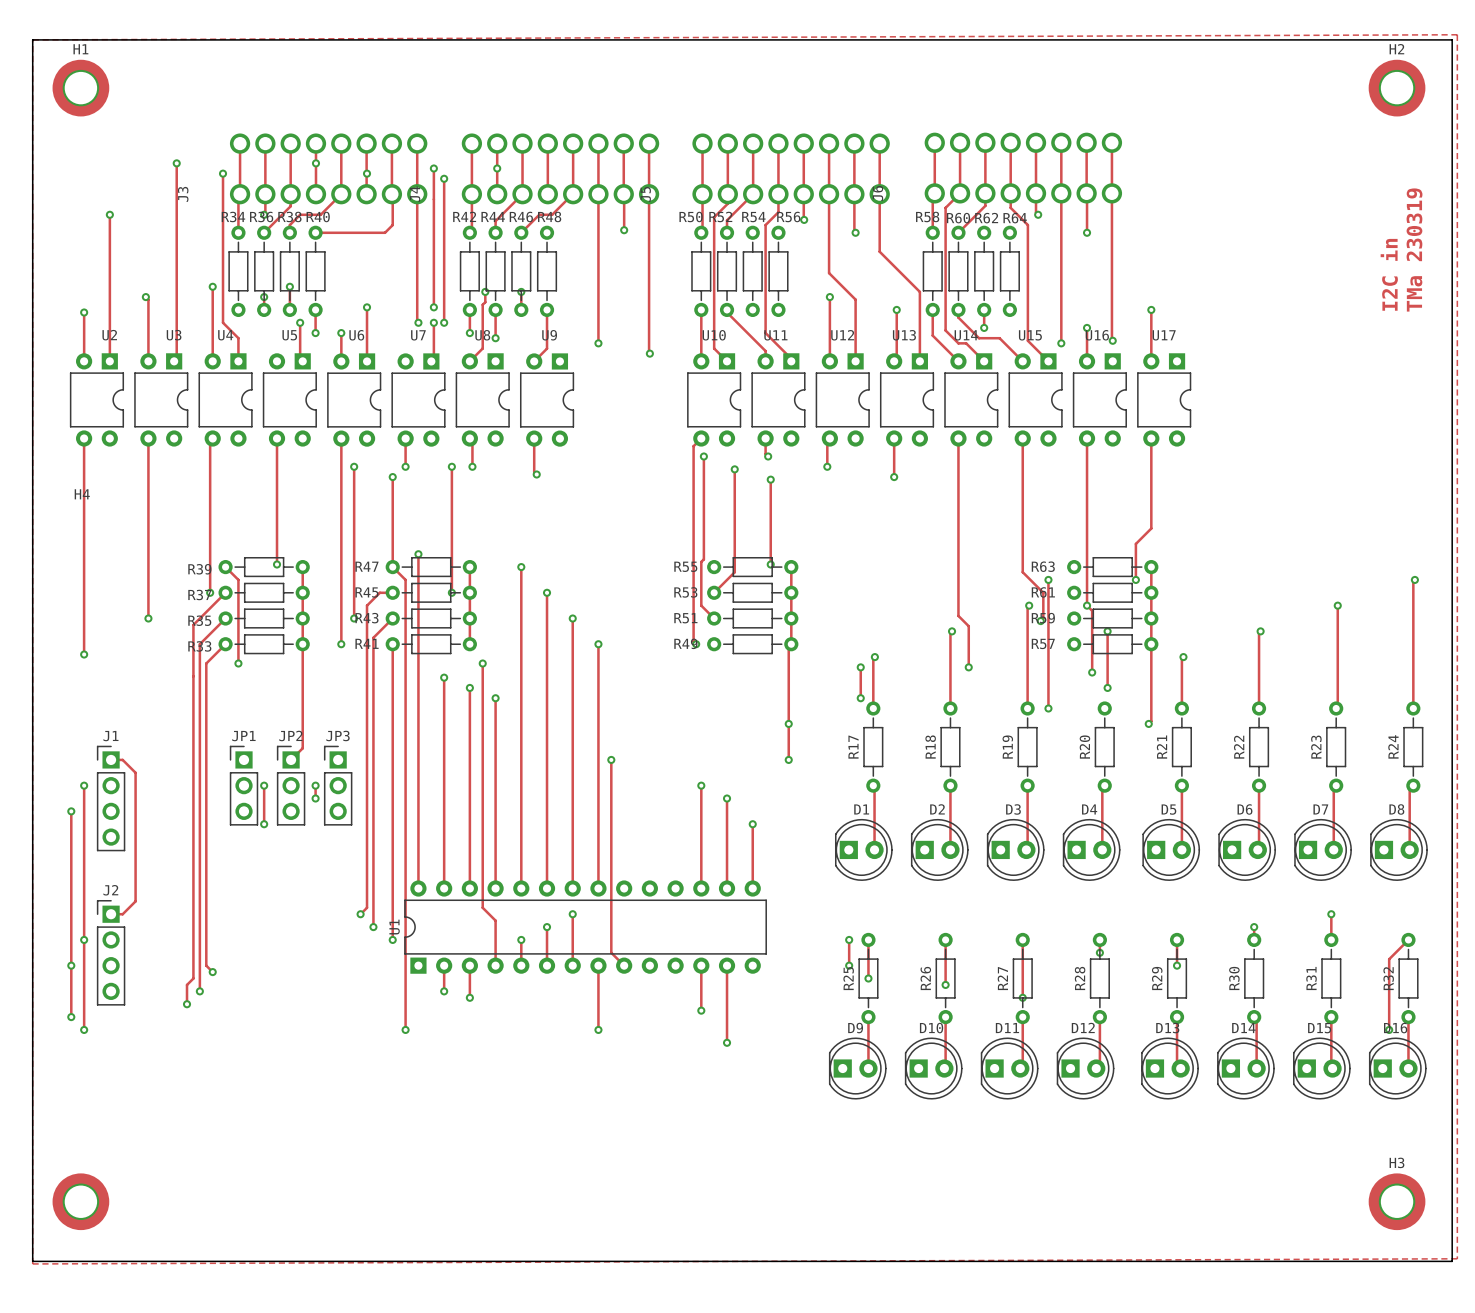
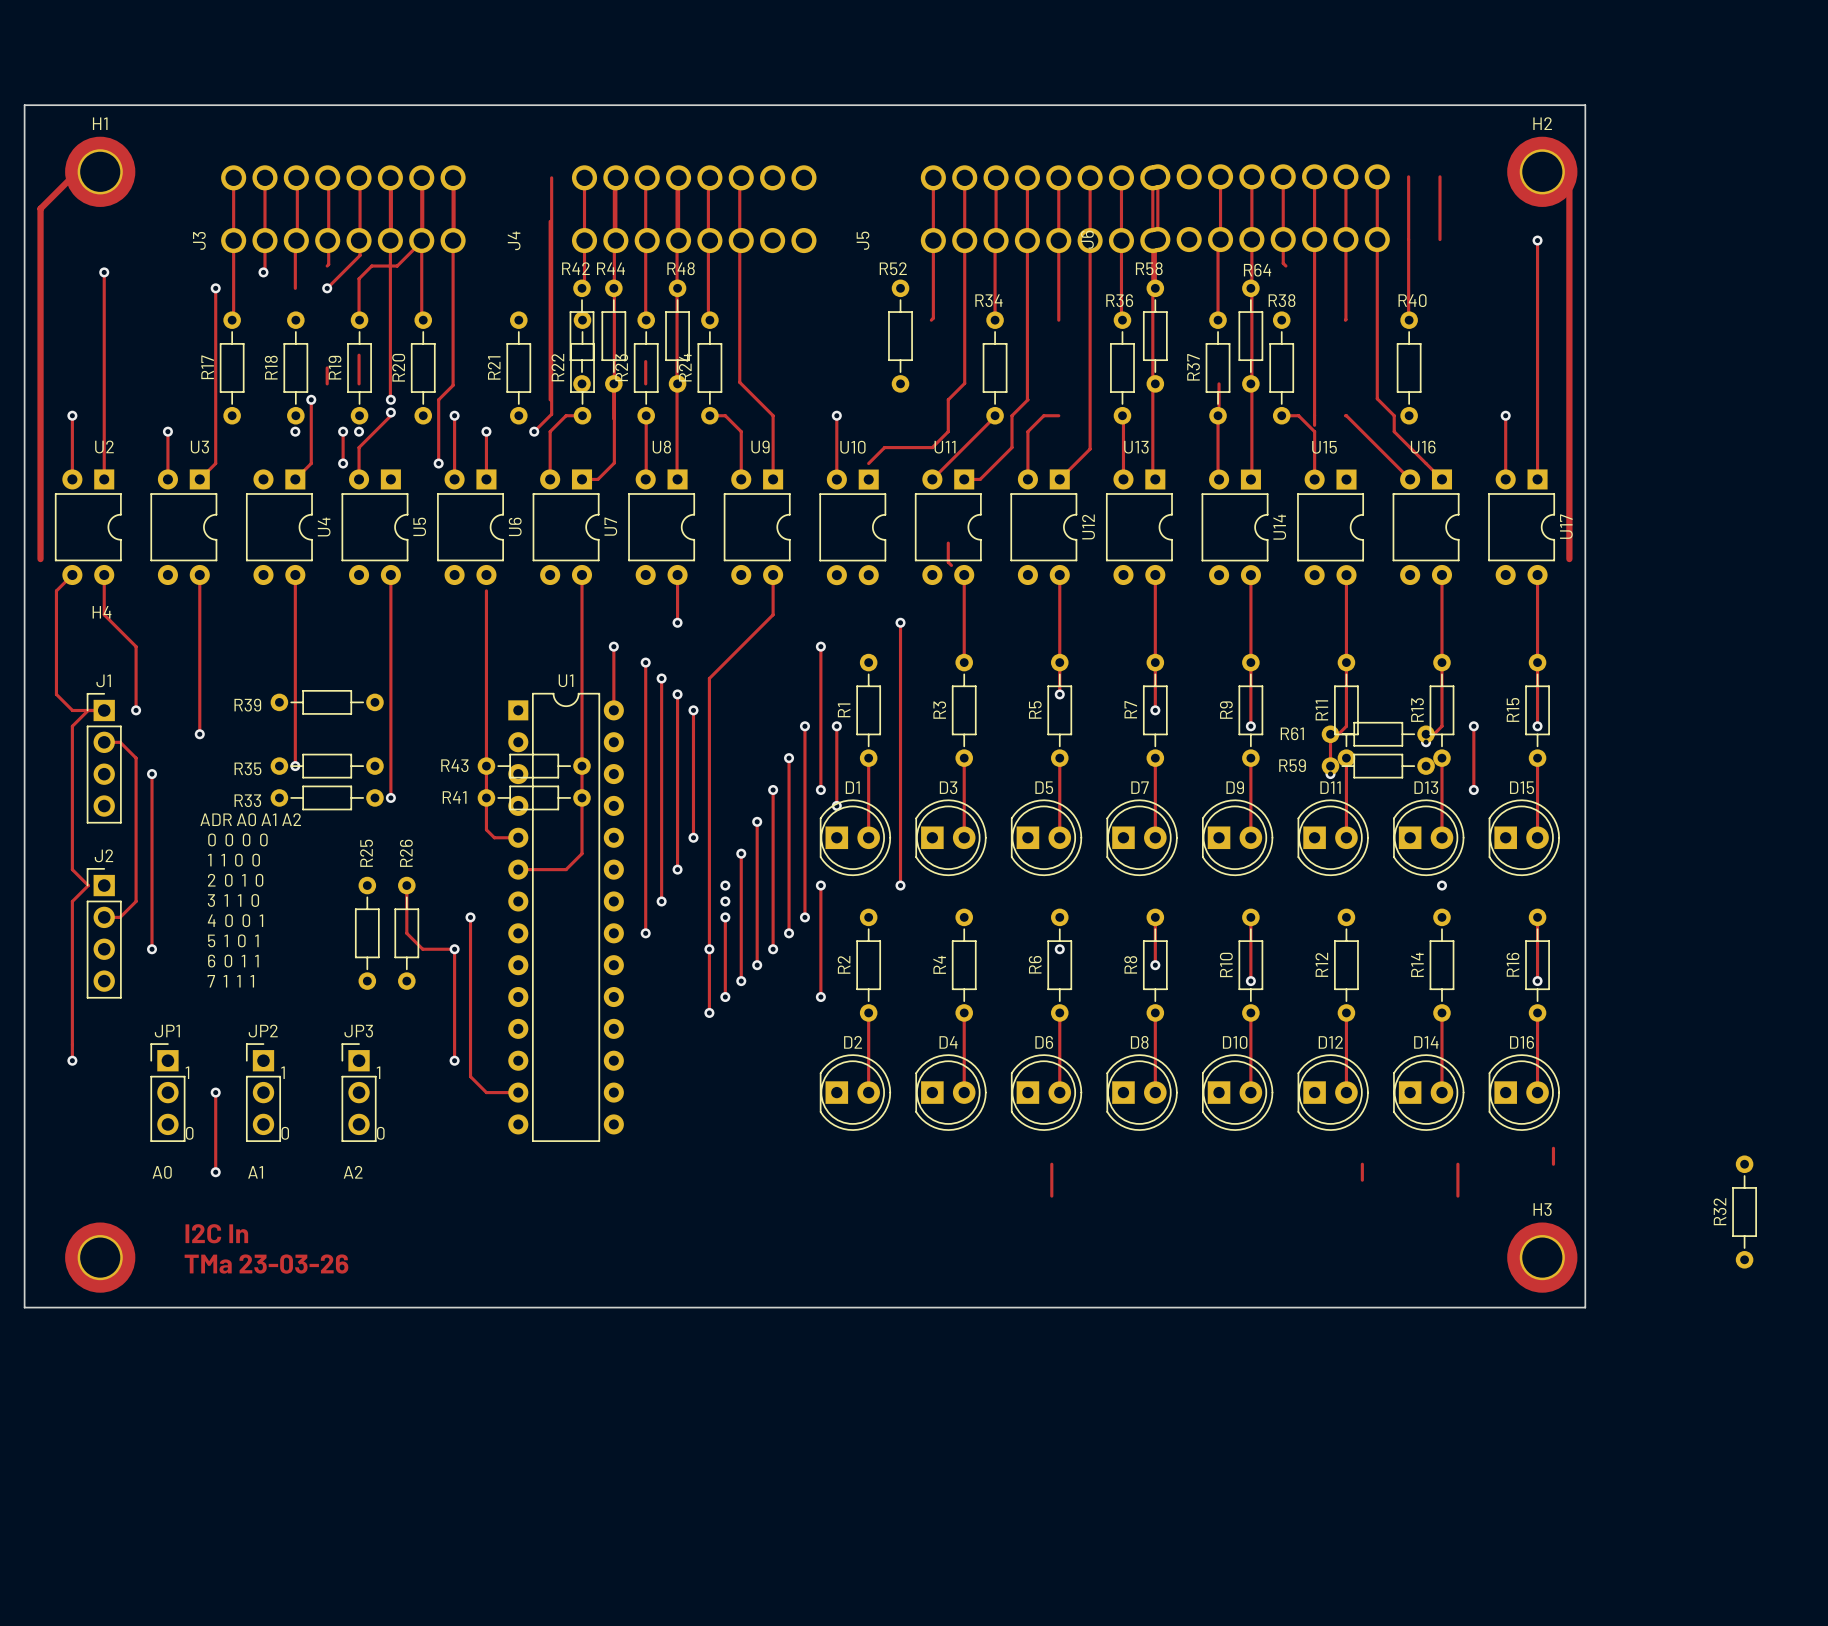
zone outline: (1457, 34) (32, 39) (32, 1263) (1457, 1258) (1457, 34) -> none
board edge: (32, 39) (1452, 39) (1452, 1261) (32, 1261) (32, 39) -> (24, 105) (24, 1307) (1585, 1307) (1585, 105) (24, 105)
H1 position: (80, 88) -> (100, 171)
H2 position: (1397, 88) -> (1542, 171)
track: none -> (100, 171) (77, 171) (40, 208) (40, 559)
track: none -> (1542, 171) (1564, 171) (1569, 176) (1569, 559)
track: (960, 142) (960, 193) (945, 207) (945, 330) (958, 343) (966, 343) (984, 361) -> none
track: none -> (1408, 176) (1409, 320)
track: none -> (1439, 176) (1439, 239)
track: none -> (233, 177) (232, 320)
track: none -> (264, 177) (263, 272)
track: none -> (390, 177) (390, 399)
track: none -> (421, 177) (423, 320)
track: none -> (453, 177) (453, 385) (438, 399) (438, 463)
track: (391, 143) (392, 225) (385, 232) (315, 232) -> none
track: (417, 143) (418, 322) -> none
track: none -> (551, 177) (551, 414) (534, 431)
track: none -> (614, 177) (614, 463) (597, 479) (582, 479)
track: none -> (645, 177) (646, 320)
track: (522, 143) (522, 194) (495, 221) (495, 232) -> none
track: none -> (677, 177) (677, 479)
track: none -> (708, 177) (709, 320)
track: (573, 143) (573, 194) (552, 214) (539, 214) (521, 232) -> none
track: none -> (739, 177) (739, 382) (773, 415) (773, 479)
track: (598, 143) (598, 343) -> none
track: (623, 143) (624, 230) -> none
track: (649, 143) (649, 353) -> none
track: (702, 143) (701, 232) -> none
track: (727, 143) (727, 203) (714, 217) (714, 348) (727, 361) -> none
track: (753, 143) (753, 194) (727, 220) (727, 232) -> (933, 177) (933, 318) (931, 320)
track: (778, 143) (778, 212) (765, 225) (765, 322) -> (964, 177) (964, 383) (948, 399)
track: (803, 143) (804, 219) -> (996, 177) (995, 320)
track: (829, 143) (829, 273) (855, 299) (855, 361) -> (1027, 177) (1027, 399) (1011, 415) (1011, 447) (980, 479) (964, 479)
track: (854, 143) (855, 232) -> (1058, 177) (1058, 320)
track: (879, 143) (879, 251) (919, 291) (919, 361) -> (1090, 177) (1090, 449) (1059, 479)
track: none -> (1121, 177) (1122, 320)
track: none -> (1152, 177) (1152, 476) (1155, 479)
track: (176, 163) (176, 358) (174, 361) -> none
via: (176, 163) -> none
via: (315, 163) -> none
J3 position: (328, 168) -> (343, 209)
track: (433, 168) (433, 307) -> none
via: (433, 168) -> none
via: (497, 168) -> none
J5 position: (791, 168) -> (1043, 209)
track: (223, 173) (223, 322) (238, 338) (238, 361) -> none
via: (223, 173) -> none
via: (367, 173) -> none
via: (444, 178) -> none
track: (985, 193) (985, 205) (958, 232) -> (1220, 239) (1218, 242) (1218, 320)
track: (1086, 193) (1087, 232) -> (1345, 239) (1345, 320)
J3 name position: J3 (183, 194) -> J3 (199, 240)
track: none -> (1537, 240) (1537, 479)
via: none -> (1537, 240)
track: (1010, 207) (1027, 225) (1027, 340) (1048, 361) -> (1251, 257) (1250, 479)
track: (109, 214) (109, 361) -> none
via position: (109, 214) -> (104, 272)
via position: (264, 214) -> (327, 288)
via: (1038, 214) -> none
track: none -> (104, 272) (104, 387)
via: none -> (263, 272)
via: (804, 219) -> none
via: (624, 230) -> none
track: none -> (215, 288) (215, 463) (199, 479)
via: none -> (215, 288)
track: none -> (359, 288) (359, 320)
via: (855, 232) -> none
via: (1087, 232) -> none
text: TMa 230319 (1414, 250) -> none
R34 position: (238, 271) -> (995, 367)
R36 position: (264, 271) -> (1122, 367)
R38 position: (289, 271) -> (1281, 367)
R40 position: (315, 271) -> (1409, 367)
R46: (521, 271) -> none
R50: (701, 271) -> none
R54: (752, 271) -> none
R56: (778, 271) -> none
R60: (958, 271) -> none
R62: (984, 271) -> none
text: I2C in (1389, 274) -> none
track: (212, 286) (212, 361) -> none
via: (212, 286) -> none
via: (289, 286) -> none
track: (485, 291) (485, 302) (482, 304) (482, 348) (469, 361) -> none
via: (485, 291) -> none
via: (521, 291) -> none
track: (145, 297) (148, 299) (148, 361) -> none
via: (145, 297) -> none
via: (264, 297) -> none
track: (829, 297) (829, 348) -> (1058, 415) (1043, 415) (1027, 431)
via: (829, 297) -> none
track: (367, 307) (367, 335) -> none
via: (367, 307) -> none
via: (433, 307) -> none
track: (315, 309) (315, 333) -> none
track: (469, 309) (469, 333) -> none
track: (547, 309) (547, 348) (534, 361) -> none
track: (701, 309) (701, 361) -> (836, 415) (836, 479)
track: (727, 309) (727, 312) (765, 351) (765, 361) -> none
track: (896, 309) (896, 358) (894, 361) -> none
via: (896, 309) -> none
track: (932, 309) (932, 335) (958, 361) -> none
track: (958, 309) (958, 317) (979, 338) (999, 338) (1022, 361) -> none
track: (1151, 309) (1151, 361) -> (1505, 415) (1505, 479)
via: (1151, 309) -> none
via: (84, 312) -> none
track: (1111, 321) (1112, 340) -> (1377, 398) (1394, 415) (1394, 431) (1441, 479)
track: none -> (311, 399) (311, 463) (295, 479)
via: none -> (311, 399)
track: (300, 322) (300, 358) (302, 361) -> none
via: (300, 322) -> none
via: none -> (390, 399)
via: (418, 322) -> none
track: (433, 322) (433, 358) (431, 361) -> none
via: (433, 322) -> none
via: (444, 322) -> none
via: (984, 327) -> none
track: (1087, 327) (1087, 361) -> none
via: (1087, 327) -> none
track: (341, 333) (341, 361) -> none
via: (341, 333) -> none
via: (469, 333) -> none
track: (765, 333) (791, 358) (791, 361) -> (948, 412) (948, 431) (932, 447) (884, 447) (868, 463)
track: none -> (72, 415) (72, 479)
via: none -> (72, 415)
U4 name rotation: 0° (225, 335) -> 90° counterclockwise (324, 526)
U4 name position: U4 (225, 335) -> U4 (324, 526)
U5 name rotation: 0° (289, 335) -> 90° counterclockwise (419, 526)
U5 name position: U5 (289, 335) -> U5 (419, 526)
track: none -> (390, 415) (359, 447) (359, 479)
U6 name rotation: 0° (356, 335) -> 90° counterclockwise (515, 526)
U6 name position: U6 (356, 335) -> U6 (515, 526)
via: none -> (454, 415)
U7 name rotation: 0° (418, 335) -> 90° counterclockwise (610, 526)
U7 name position: U7 (418, 335) -> U7 (610, 526)
track: none -> (582, 415) (566, 415) (550, 431) (550, 479)
track: none -> (646, 415) (645, 479)
track: none -> (709, 415) (725, 415) (741, 431) (741, 479)
track: none -> (995, 415) (932, 479)
U12 name rotation: 0° (842, 335) -> 90° counterclockwise (1088, 526)
U12 name position: U12 (842, 335) -> U12 (1088, 526)
track: none -> (1122, 415) (1123, 479)
U14 name rotation: 0° (966, 335) -> 90° counterclockwise (1279, 527)
U14 name position: U14 (966, 335) -> U14 (1279, 527)
track: none -> (1218, 415) (1219, 479)
track: none -> (1281, 415) (1298, 415) (1314, 431) (1314, 479)
track: none -> (1345, 415) (1410, 479)
U17 name rotation: 0° (1164, 335) -> 90° counterclockwise (1566, 526)
U17 name position: U17 (1164, 335) -> U17 (1566, 526)
via: none -> (1505, 415)
via: (495, 338) -> none
via: (1112, 340) -> none
via: (598, 343) -> none
via: (1061, 343) -> none
track: none -> (167, 431) (167, 479)
via: none -> (167, 431)
via: none -> (295, 431)
track: none -> (343, 431) (343, 463)
via: none -> (343, 431)
via: none -> (359, 431)
track: none -> (486, 431) (486, 479)
via: none -> (486, 431)
via: none -> (534, 431)
via position: (649, 353) -> (836, 415)
track: none -> (104, 447) (104, 479)
track: none -> (454, 447) (454, 479)
track: none -> (1027, 447) (1027, 479)
via: none -> (343, 463)
via: none -> (438, 463)
U2 position: (96, 399) -> (88, 527)
U3 position: (161, 399) -> (183, 527)
U4 position: (225, 399) -> (279, 527)
U5 position: (289, 399) -> (374, 527)
U8 position: (482, 399) -> (661, 527)
U10 position: (714, 399) -> (852, 527)
U11 position: (778, 399) -> (948, 527)
U12 position: (842, 399) -> (1043, 527)
U13 position: (907, 399) -> (1139, 527)
U14 position: (971, 399) -> (1235, 527)
U15 position: (1035, 399) -> (1330, 527)
U16 position: (1099, 399) -> (1426, 527)
U17 position: (1164, 399) -> (1521, 527)
U6 position: (354, 400) -> (470, 527)
U7 position: (418, 400) -> (566, 527)
U9 position: (547, 400) -> (757, 527)
track: (84, 438) (84, 654) -> none
track: (148, 438) (148, 618) -> (390, 574) (390, 797)
track: (212, 438) (210, 441) (210, 592) -> none
track: (277, 438) (277, 564) -> none
track: (341, 438) (341, 644) -> none
track: (405, 438) (405, 466) -> none
track: (469, 438) (472, 441) (472, 466) -> none
track: (534, 438) (534, 471) (536, 474) -> none
track: (701, 438) (693, 446) (693, 641) (696, 644) -> none
track: (829, 438) (827, 441) (827, 466) -> none
track: (894, 438) (894, 477) -> none
track: (958, 438) (958, 615) (968, 626) (968, 667) -> none
track: (1022, 438) (1022, 572) (1043, 592) (1043, 618) (1040, 621) -> none
track: (1087, 438) (1087, 464) -> none
track: (1151, 438) (1151, 528) (1135, 543) (1135, 579) -> none
track: (703, 456) (703, 559) (701, 561) (701, 605) (714, 618) -> none
via: (703, 456) -> none
via: (768, 456) -> none
track: none -> (72, 574) (56, 590) (56, 694) (72, 710) (104, 710)
track: none -> (104, 574) (104, 614) (136, 646) (136, 710)
track: none -> (199, 574) (199, 734)
track: none -> (582, 574) (582, 702)
track: none -> (677, 574) (677, 622)
track: none -> (773, 574) (773, 614) (709, 678) (709, 766)
track: none -> (964, 574) (964, 662)
track: none -> (1059, 574) (1059, 694)
track: none -> (1155, 574) (1155, 710)
track: none -> (1250, 575) (1250, 662)
track: none -> (1441, 574) (1441, 726) (1426, 742)
track: none -> (1537, 574) (1537, 726)
track: (354, 466) (354, 618) -> none
via: (354, 466) -> none
via: (405, 466) -> none
track: (451, 466) (451, 592) -> none
via: (451, 466) -> none
via: (472, 466) -> none
via: (827, 466) -> none
track: (734, 469) (734, 572) (714, 592) -> none
via: (734, 469) -> none
via position: (536, 474) -> (677, 622)
via: (392, 477) -> none
via: (894, 477) -> none
track: (770, 479) (770, 564) -> none
via: (770, 479) -> none
track: none -> (900, 622) (900, 885)
via: none -> (900, 622)
track: none -> (613, 646) (613, 710)
via: none -> (613, 646)
track: none -> (820, 646) (820, 789)
via: none -> (820, 646)
track: none -> (645, 662) (645, 702)
via: none -> (645, 662)
track: none -> (1250, 662) (1250, 726)
track: none -> (661, 678) (661, 901)
via: none -> (661, 678)
track: (418, 554) (418, 888) -> none
via: (418, 554) -> none
track: none -> (677, 694) (677, 734)
via: none -> (677, 694)
via: none -> (1059, 694)
via: (277, 564) -> none
via: (770, 564) -> none
track: (225, 567) (238, 579) -> (295, 574) (295, 718)
track: (302, 567) (302, 748) (291, 759) -> none
track: (392, 567) (405, 579) (405, 1029) -> (486, 702) (486, 797)
R47: (431, 567) -> none
via: (521, 567) -> none
R55: (752, 567) -> none
track: (791, 567) (791, 644) (788, 646) (788, 759) -> none
R63: (1112, 567) -> none
track: (1151, 567) (1151, 721) (1148, 723) -> none
track: none -> (88, 710) (72, 726) (72, 869) (88, 885) (72, 901) (72, 1060)
via: none -> (136, 710)
track: none -> (693, 710) (693, 837)
via: none -> (693, 710)
R1: none -> (868, 710)
R3: none -> (964, 710)
R5: none -> (1059, 710)
R7: none -> (1155, 710)
via: none -> (1155, 710)
R9: none -> (1250, 710)
R11: none -> (1346, 710)
R13: none -> (1441, 710)
R15: none -> (1537, 710)
track: (1048, 579) (1048, 708) -> none
via: (1048, 579) -> none
via position: (1135, 579) -> (1426, 742)
track: (1414, 579) (1413, 581) (1413, 708) -> none
via: (1414, 579) -> none
track: none -> (804, 726) (804, 917)
via: none -> (804, 726)
track: none -> (836, 726) (836, 805)
via: none -> (836, 726)
via: none -> (1250, 726)
track: (1087, 586) (1087, 605) (1092, 610) (1092, 672) -> (1346, 726) (1330, 742) (1330, 774)
track: none -> (1473, 726) (1473, 789)
via: none -> (1473, 726)
via: none -> (1537, 726)
via: none -> (199, 734)
via: (210, 592) -> none
track: (225, 592) (193, 624) (193, 978) (187, 984) (187, 1004) -> none
R37 rotation: 0° (264, 592) -> 90° clockwise (1218, 367)
R37 position: (264, 592) -> (1218, 367)
track: (392, 592) (379, 592) (367, 605) (367, 766) -> (406, 885) (406, 933) (422, 949) (454, 949)
R45: (431, 592) -> none
via: (451, 592) -> none
via: (547, 592) -> none
R53: (752, 592) -> none
R37 name position: R37 (199, 594) -> R37 (1193, 367)
track: none -> (104, 742) (120, 742) (136, 758) (136, 901) (120, 917) (104, 917)
track: (1029, 605) (1027, 607) (1027, 708) -> none
via: (1029, 605) -> none
via: (1087, 605) -> none
track: (1337, 605) (1337, 706) (1336, 708) -> none
via: (1337, 605) -> none
track: none -> (789, 758) (789, 933)
via: none -> (789, 758)
track: none -> (868, 758) (868, 837)
track: none -> (964, 758) (964, 837)
track: none -> (1059, 758) (1059, 837)
track: none -> (1155, 758) (1155, 837)
track: none -> (1250, 758) (1250, 837)
track: none -> (1346, 758) (1346, 837)
track: none -> (1441, 758) (1441, 837)
track: none -> (1537, 758) (1537, 837)
via: (148, 618) -> none
track: (225, 618) (199, 644) (199, 991) -> none
track: (238, 618) (238, 663) -> none
via: none -> (295, 766)
via: (354, 618) -> none
track: (392, 618) (373, 637) (373, 927) -> none
via: (572, 618) -> none
R51: (752, 618) -> none
via: (1040, 621) -> none
track: none -> (152, 774) (152, 949)
via: none -> (152, 774)
via: none -> (1330, 774)
track: (952, 631) (950, 632) (950, 708) -> none
via: (952, 631) -> none
track: (1107, 631) (1107, 687) -> none
via: (1107, 631) -> none
track: (1260, 631) (1259, 632) (1259, 708) -> none
via: (1260, 631) -> none
track: none -> (773, 789) (773, 949)
via: none -> (773, 789)
via: none -> (820, 789)
track: (225, 644) (206, 663) (206, 965) (212, 972) -> none
via: none -> (390, 797)
via: (341, 644) -> none
track: none -> (582, 797) (582, 852)
track: (598, 644) (598, 689) -> none
via: (598, 644) -> none
via: (696, 644) -> none
R49: (752, 644) -> none
R57: (1112, 644) -> none
via: none -> (836, 805)
via: (84, 654) -> none
track: (874, 657) (873, 658) (873, 708) -> none
via: (874, 657) -> none
track: (1183, 657) (1181, 658) (1181, 708) -> none
via position: (1183, 657) -> (1473, 789)
text: none -> ADR A0 A1 A2 (250, 819)
via: (238, 663) -> none
track: (482, 663) (482, 907) (495, 920) (495, 965) -> none
via: (482, 663) -> none
via: none -> (757, 821)
track: (860, 667) (860, 698) -> none
via: (860, 667) -> none
via: (968, 667) -> none
track: (392, 669) (392, 939) -> (486, 829) (494, 837) (518, 837)
via: (1092, 672) -> none
via: none -> (693, 837)
track: (444, 677) (444, 888) -> none
via: (444, 677) -> none
text: none -> 0 0 0 0 (237, 839)
via: (469, 687) -> none
via: (1107, 687) -> none
track: (469, 689) (469, 888) -> (582, 853) (566, 869) (518, 869)
via: none -> (741, 853)
text: none -> 1 1 0 0 (233, 860)
track: (495, 698) (495, 888) -> none
via: (495, 698) -> none
via: (860, 698) -> none
track: (547, 702) (547, 888) -> none
via: none -> (677, 869)
via: (1048, 708) -> none
text: none -> 2 0 1 0 (235, 880)
via: none -> (725, 885)
via: none -> (820, 885)
via: none -> (900, 885)
via: (788, 723) -> none
via position: (1148, 723) -> (1441, 885)
text: none -> 3 1 1 0 (233, 900)
via: none -> (661, 901)
via: none -> (725, 901)
track: none -> (470, 917) (470, 1076) (486, 1092) (518, 1092)
via: none -> (470, 917)
via: none -> (725, 917)
via: none -> (804, 917)
track: none -> (1250, 917) (1250, 981)
track: none -> (1537, 917) (1537, 981)
text: none -> 4 0 0 1 (235, 920)
R17 position: (873, 747) -> (232, 367)
R18 position: (950, 747) -> (295, 367)
R19 position: (1027, 747) -> (359, 367)
R20 position: (1104, 747) -> (423, 367)
R21 position: (1181, 747) -> (518, 367)
R22 position: (1259, 747) -> (582, 367)
R23 position: (1336, 747) -> (646, 367)
R24 position: (1413, 747) -> (709, 367)
track: (521, 753) (521, 888) -> none
via: none -> (645, 933)
via: none -> (789, 933)
track: (111, 759) (122, 759) (135, 772) (135, 901) (122, 914) (111, 914) -> none
text: none -> 5 1 0 1 (233, 940)
via: (611, 759) -> none
via: (788, 759) -> none
via: none -> (152, 949)
via: none -> (454, 949)
via: none -> (709, 949)
via: none -> (773, 949)
via: none -> (1059, 949)
text: none -> 6 0 1 1 (233, 961)
track: (611, 779) (611, 952) (624, 965) -> none
via: none -> (757, 965)
R2: none -> (868, 965)
R4: none -> (964, 965)
R6: none -> (1059, 965)
R8: none -> (1155, 965)
via: none -> (1155, 965)
R10: none -> (1250, 965)
R12: none -> (1346, 965)
R14: none -> (1441, 965)
R16: none -> (1537, 965)
track: (84, 785) (84, 1029) -> none
via: (84, 785) -> none
JP1 position: (244, 785) -> (167, 1092)
track: (264, 785) (264, 824) -> none
via: (264, 785) -> none
JP2 position: (291, 785) -> (263, 1092)
track: (315, 785) (315, 798) -> none
via: (315, 785) -> none
JP3 position: (338, 785) -> (359, 1092)
track: (701, 785) (701, 817) -> none
via: (701, 785) -> none
track: (873, 785) (874, 849) -> none
track: (950, 785) (950, 849) -> (1155, 1012) (1155, 1092)
track: (1027, 785) (1026, 849) -> none
track: (1104, 785) (1102, 788) (1102, 849) -> none
track: (1181, 785) (1181, 849) -> (1441, 1012) (1441, 1092)
track: (1259, 785) (1257, 849) -> none
track: (1336, 785) (1333, 788) (1333, 849) -> none
track: (1413, 785) (1409, 789) (1409, 849) -> none
text: none -> 7 1 1 1 (230, 981)
track: (598, 792) (598, 888) -> (757, 821) (757, 941)
via: none -> (741, 981)
via: none -> (1250, 981)
via: none -> (1537, 981)
J1 position: (111, 798) -> (104, 758)
via: (315, 798) -> none
track: (727, 798) (727, 888) -> (820, 885) (820, 997)
via: (727, 798) -> none
via: none -> (725, 997)
via: none -> (820, 997)
track: (71, 811) (71, 1017) -> none
via: (71, 811) -> none
track: (572, 817) (572, 888) -> none
via: none -> (709, 1012)
track: none -> (1059, 1012) (1059, 1092)
track: none -> (1250, 1012) (1250, 1092)
track: none -> (1346, 1012) (1346, 1092)
track: none -> (1537, 1012) (1537, 1092)
D1 footprint: [835, 819, 893, 881] -> [819, 799, 891, 877]
D2 footprint: [911, 819, 969, 881] -> [819, 1054, 891, 1131]
D3 footprint: [987, 819, 1045, 881] -> [915, 799, 987, 877]
D4 footprint: [1062, 819, 1121, 881] -> [915, 1054, 987, 1131]
D5 footprint: [1142, 819, 1200, 881] -> [1010, 799, 1083, 877]
D6 footprint: [1218, 819, 1276, 881] -> [1010, 1054, 1083, 1131]
D7 footprint: [1294, 819, 1352, 881] -> [1106, 799, 1178, 877]
D8 footprint: [1370, 819, 1428, 881] -> [1106, 1054, 1178, 1131]
via: (264, 824) -> none
track: (752, 824) (752, 888) -> (964, 1012) (964, 1092)
via: (752, 824) -> none
via: none -> (72, 1060)
track: (367, 856) (367, 907) (360, 914) -> none
via: none -> (454, 1060)
text: none -> 1 (187, 1072)
text: none -> 1 (282, 1072)
text: none -> 1 (378, 1072)
track: none -> (215, 1092) (215, 1172)
via: none -> (215, 1092)
text: none -> 0 (189, 1133)
text: none -> 0 (285, 1133)
text: none -> 0 (380, 1133)
via: (360, 914) -> none
track: (572, 914) (572, 965) -> none
via: (572, 914) -> none
track: (1331, 914) (1331, 939) -> none
via: (1331, 914) -> none
via: (373, 927) -> none
track: (547, 927) (547, 965) -> none
via: (547, 927) -> none
U1 rotation: 0° (585, 927) -> 90° clockwise (566, 917)
U1 position: (585, 927) -> (566, 917)
via: (1254, 927) -> none
via: (84, 939) -> none
via: (392, 939) -> none
track: (521, 939) (521, 965) -> none
via: (521, 939) -> none
via: (849, 939) -> none
track: (868, 939) (868, 978) -> (1155, 917) (1155, 965)
track: (945, 939) (945, 984) -> none
track: (1022, 939) (1022, 997) -> none
track: (1408, 939) (1389, 959) (1389, 1029) -> none
text: none -> A0 (162, 1172)
via: none -> (215, 1172)
text: none -> A1 (255, 1172)
text: none -> A2 (353, 1172)
J2 position: (111, 952) -> (104, 933)
via: (1099, 952) -> none
via: (71, 965) -> none
track: (444, 965) (444, 991) -> none
track: (469, 965) (469, 997) -> none
track: (598, 965) (598, 1029) -> (725, 917) (725, 997)
track: (701, 965) (701, 1010) -> none
track: (727, 965) (727, 1042) -> none
via: (849, 965) -> none
via: (1177, 965) -> none
via: (212, 972) -> none
R25 name position: R25 (848, 978) -> R25 (366, 853)
R25 position: (868, 978) -> (367, 933)
via: (868, 978) -> none
R26 name position: R26 (925, 978) -> R26 (406, 853)
R26 position: (945, 978) -> (406, 933)
R27: (1022, 978) -> none
R28: (1099, 978) -> none
R29: (1177, 978) -> none
R30: (1254, 978) -> none
R31: (1331, 978) -> none
via: (945, 984) -> none
via: (199, 991) -> none
via: (444, 991) -> none
text: none -> I2C In (216, 1233)
via: (469, 997) -> none
via: (1022, 997) -> none
via: (187, 1004) -> none
via: (701, 1010) -> none
via: (71, 1017) -> none
track: (868, 1017) (868, 1068) -> none
track: (945, 1017) (944, 1068) -> none
track: (1022, 1017) (1022, 1066) (1020, 1068) -> none
track: (1099, 1017) (1099, 1064) (1096, 1068) -> none
track: (1177, 1017) (1177, 1064) (1180, 1068) -> none
track: (1254, 1017) (1256, 1019) (1256, 1068) -> none
track: (1331, 1017) (1332, 1068) -> none
track: (1408, 1017) (1408, 1068) -> none
text: none -> TMa 23-03-26 (266, 1264)
via: (84, 1029) -> none
via: (405, 1029) -> none
via: (598, 1029) -> none
via: (1389, 1029) -> none
D9 footprint: [829, 1037, 887, 1100] -> [1202, 799, 1274, 877]
D10 footprint: [905, 1037, 963, 1100] -> [1202, 1054, 1274, 1131]
D11 footprint: [980, 1037, 1039, 1100] -> [1297, 799, 1369, 877]
D12 footprint: [1056, 1037, 1115, 1100] -> [1297, 1054, 1369, 1131]
D13 footprint: [1141, 1037, 1199, 1100] -> [1393, 799, 1465, 877]
D14 footprint: [1217, 1037, 1275, 1100] -> [1393, 1054, 1465, 1131]
D15 footprint: [1293, 1037, 1351, 1100] -> [1488, 799, 1560, 877]
D16 footprint: [1369, 1037, 1427, 1100] -> [1488, 1054, 1560, 1131]
via: (727, 1042) -> none
H4 position: (80, 1201) -> (100, 1257)
H3 position: (1397, 1201) -> (1542, 1257)

